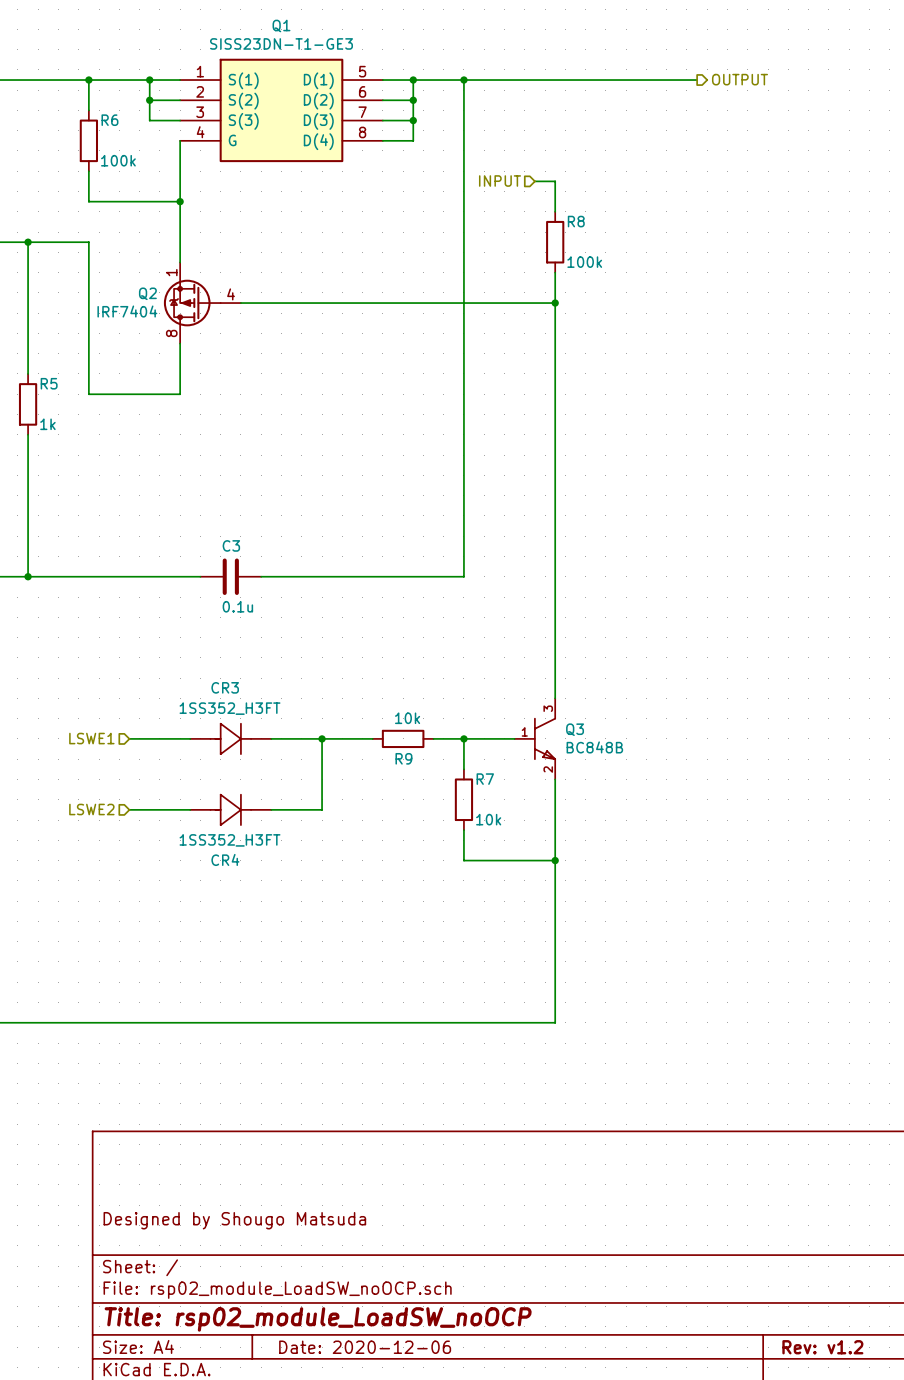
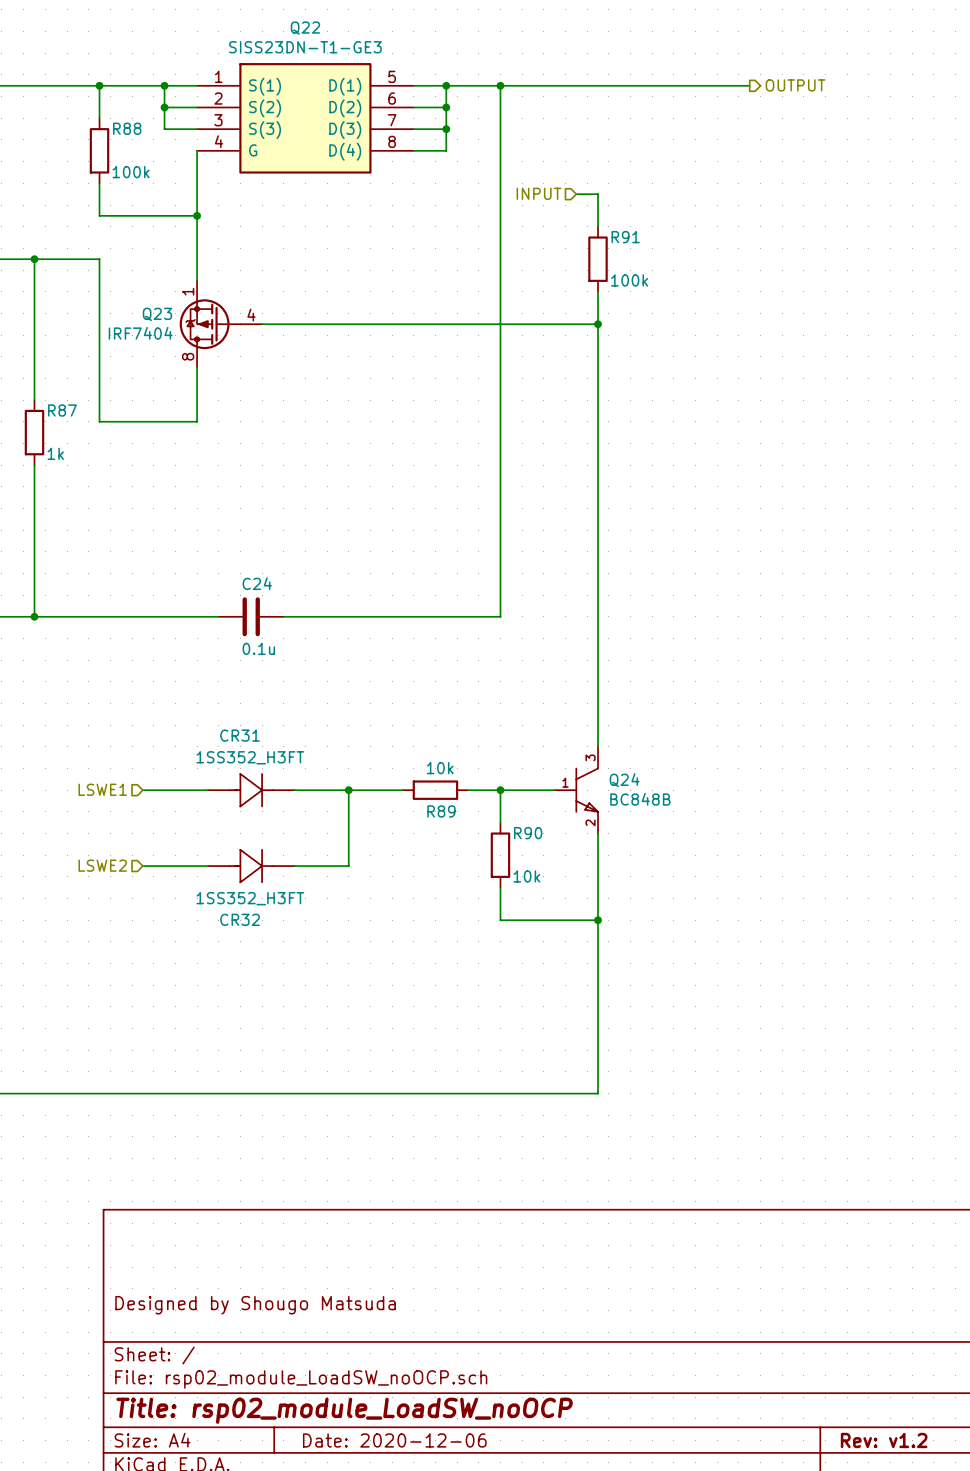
Q1 name: Q1 (281, 25) -> Q22 (305, 28)
R6 name: R6 (109, 120) -> R88 (127, 128)
R8 name: R8 (576, 221) -> R91 (625, 237)
Q2 name: Q2 (147, 293) -> Q23 (157, 314)
R5 name: R5 (49, 383) -> R87 (62, 410)
C3 name: C3 (231, 545) -> C24 (257, 583)
CR3 name: CR3 (225, 687) -> CR31 (240, 735)
Q3 name: Q3 (575, 729) -> Q24 (624, 780)
R9 name: R9 (403, 758) -> R89 (441, 811)
R7 name: R7 (485, 779) -> R90 (528, 833)
CR4 name: CR4 (225, 859) -> CR32 (240, 919)

